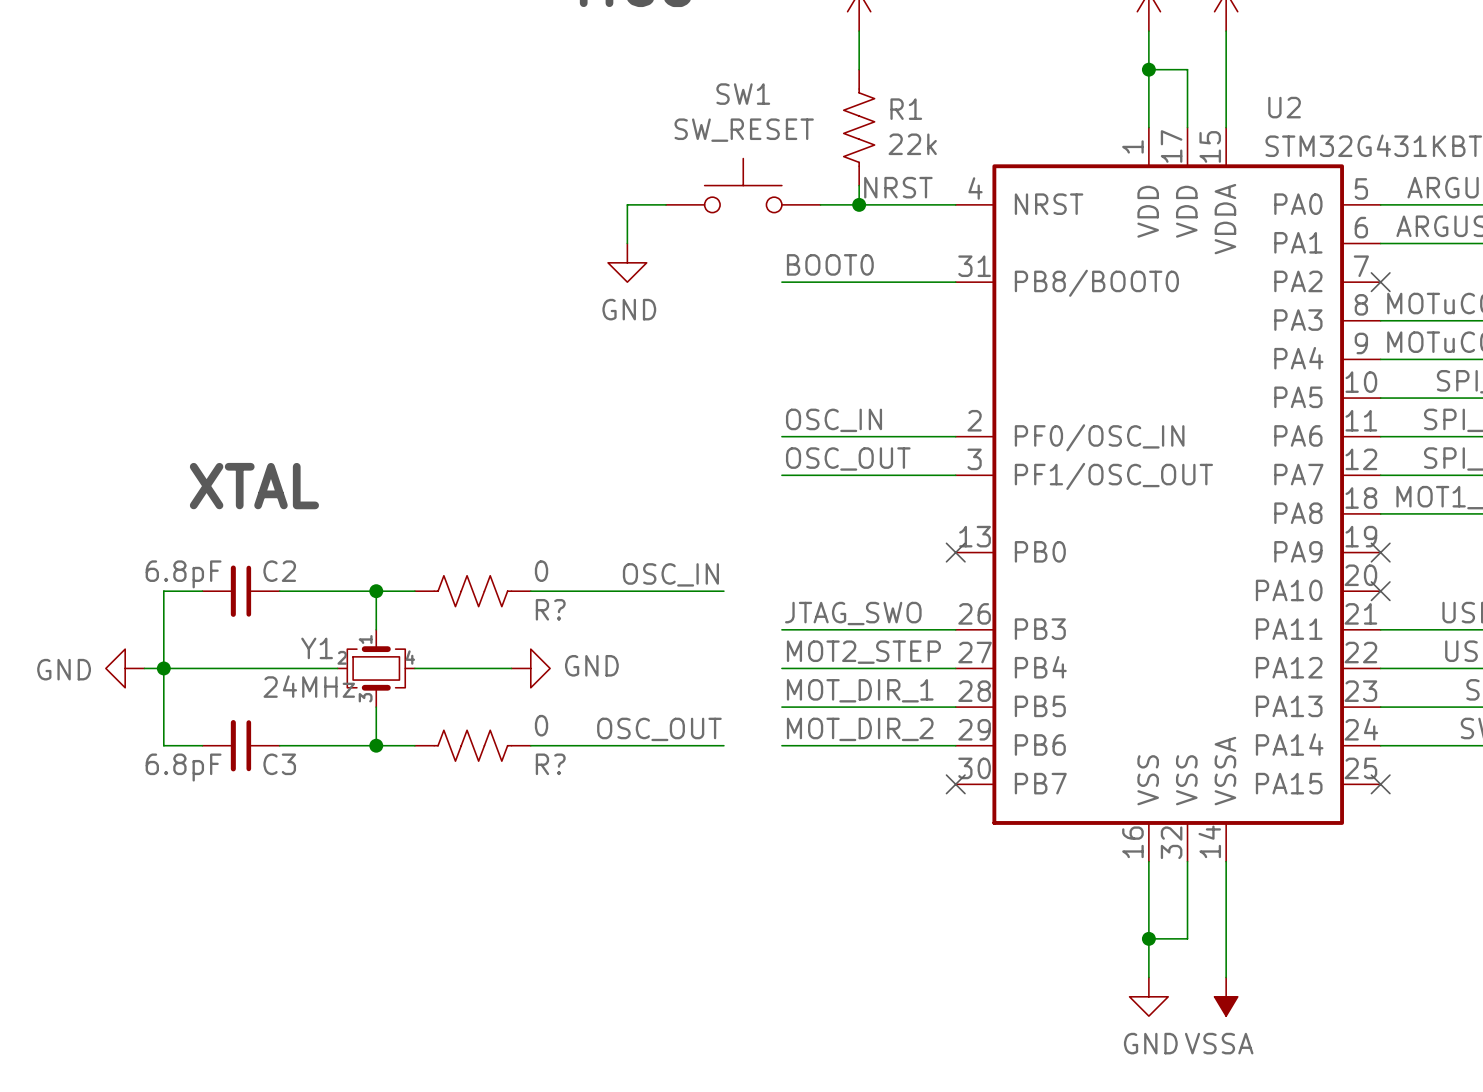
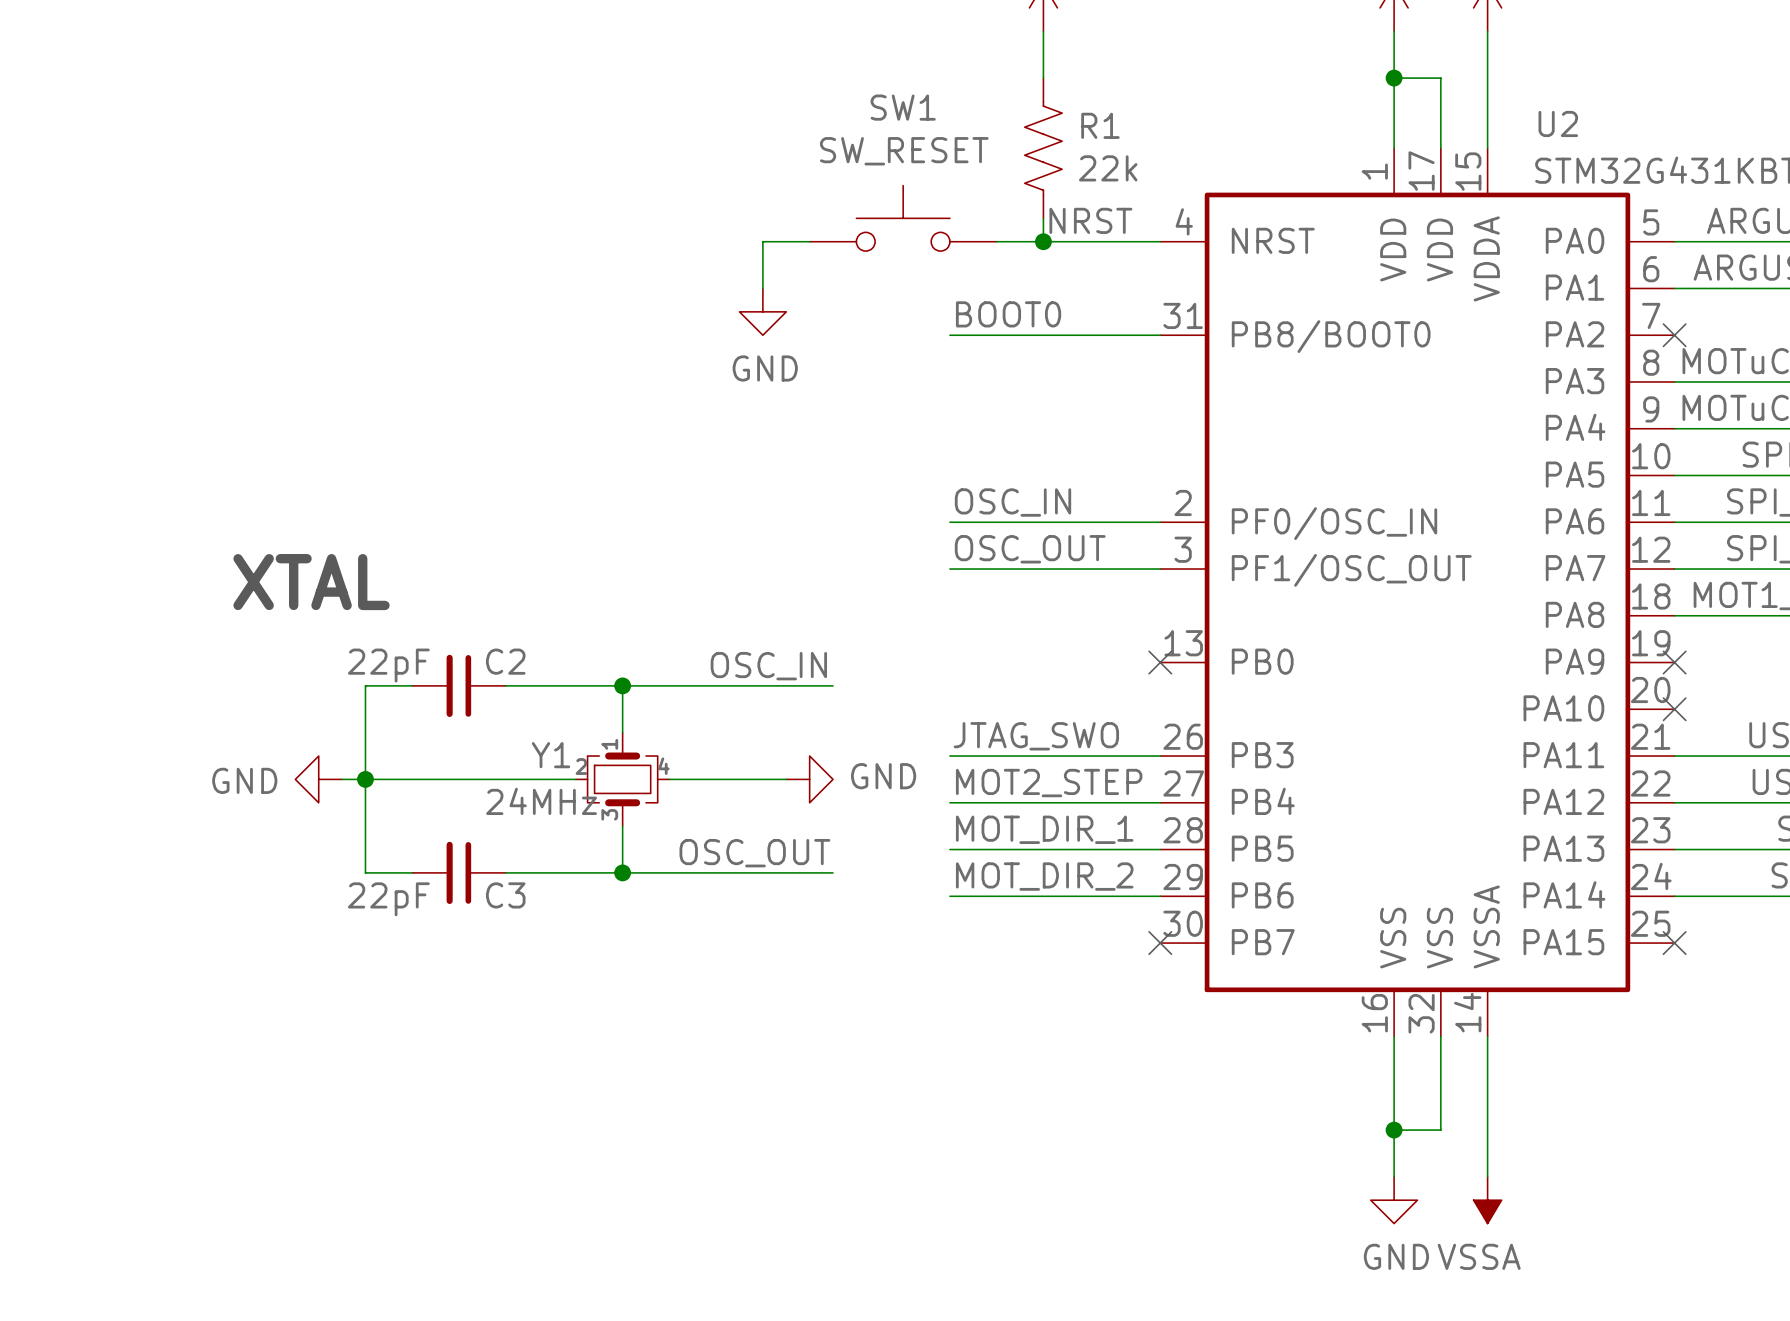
wire: none -> (505, 685) (833, 685)
junction: none -> (622, 685)
C2 value: 6.8pF (183, 574) -> 22pF (388, 665)
label position: OSC_IN (670, 574) -> OSC_IN (768, 666)
wire: (202, 591) (163, 591) (163, 745) (202, 745) -> (412, 685) (365, 685) (365, 872) (412, 872)
C2 position: (241, 591) -> (458, 685)
wire: (279, 591) (414, 591) -> none
wire: (376, 591) (376, 629) -> (622, 685) (622, 732)
junction: (376, 591) -> none
R?: 0 (472, 591) -> none
wire: (530, 591) (723, 591) -> none
power symbol: none -> GND (318, 779)
junction: none -> (365, 779)
power symbol: none -> GND (809, 779)
power symbol: GND (125, 668) -> none
wire: (144, 668) (337, 668) -> (342, 779) (575, 779)
junction: (163, 668) -> none
Y1 position: (376, 668) -> (622, 779)
wire: (414, 668) (511, 668) -> (669, 779) (786, 779)
power symbol: GND (530, 668) -> none
wire: (376, 707) (376, 745) -> (622, 826) (622, 872)
wire: none -> (505, 872) (833, 872)
junction: none -> (622, 872)
label position: OSC_OUT (659, 729) -> OSC_OUT (754, 853)
C3 position: (241, 745) -> (458, 872)
wire: (279, 745) (414, 745) -> none
junction: (376, 745) -> none
R?: 0 (472, 745) -> none
wire: (530, 745) (723, 745) -> none
C3 value: 6.8pF (183, 767) -> 22pF (388, 899)

